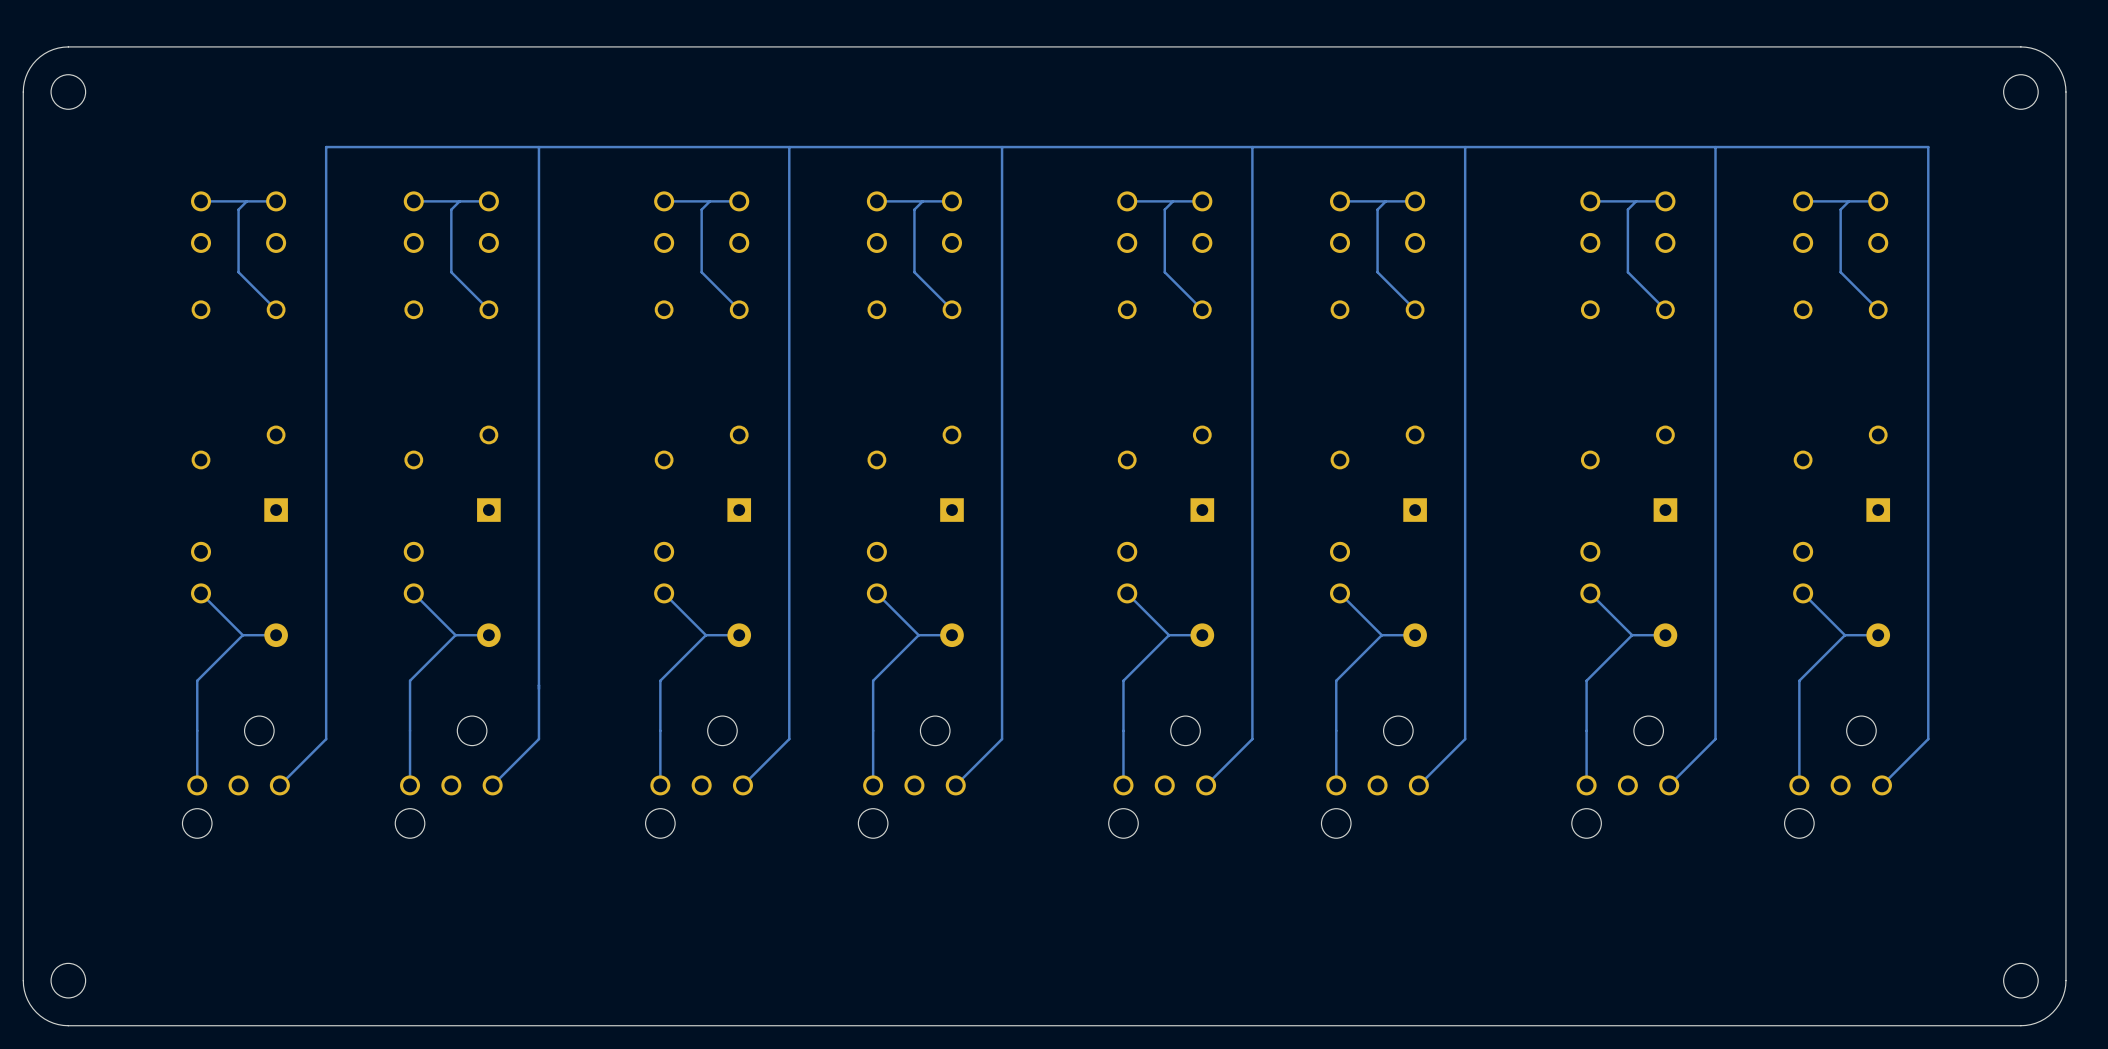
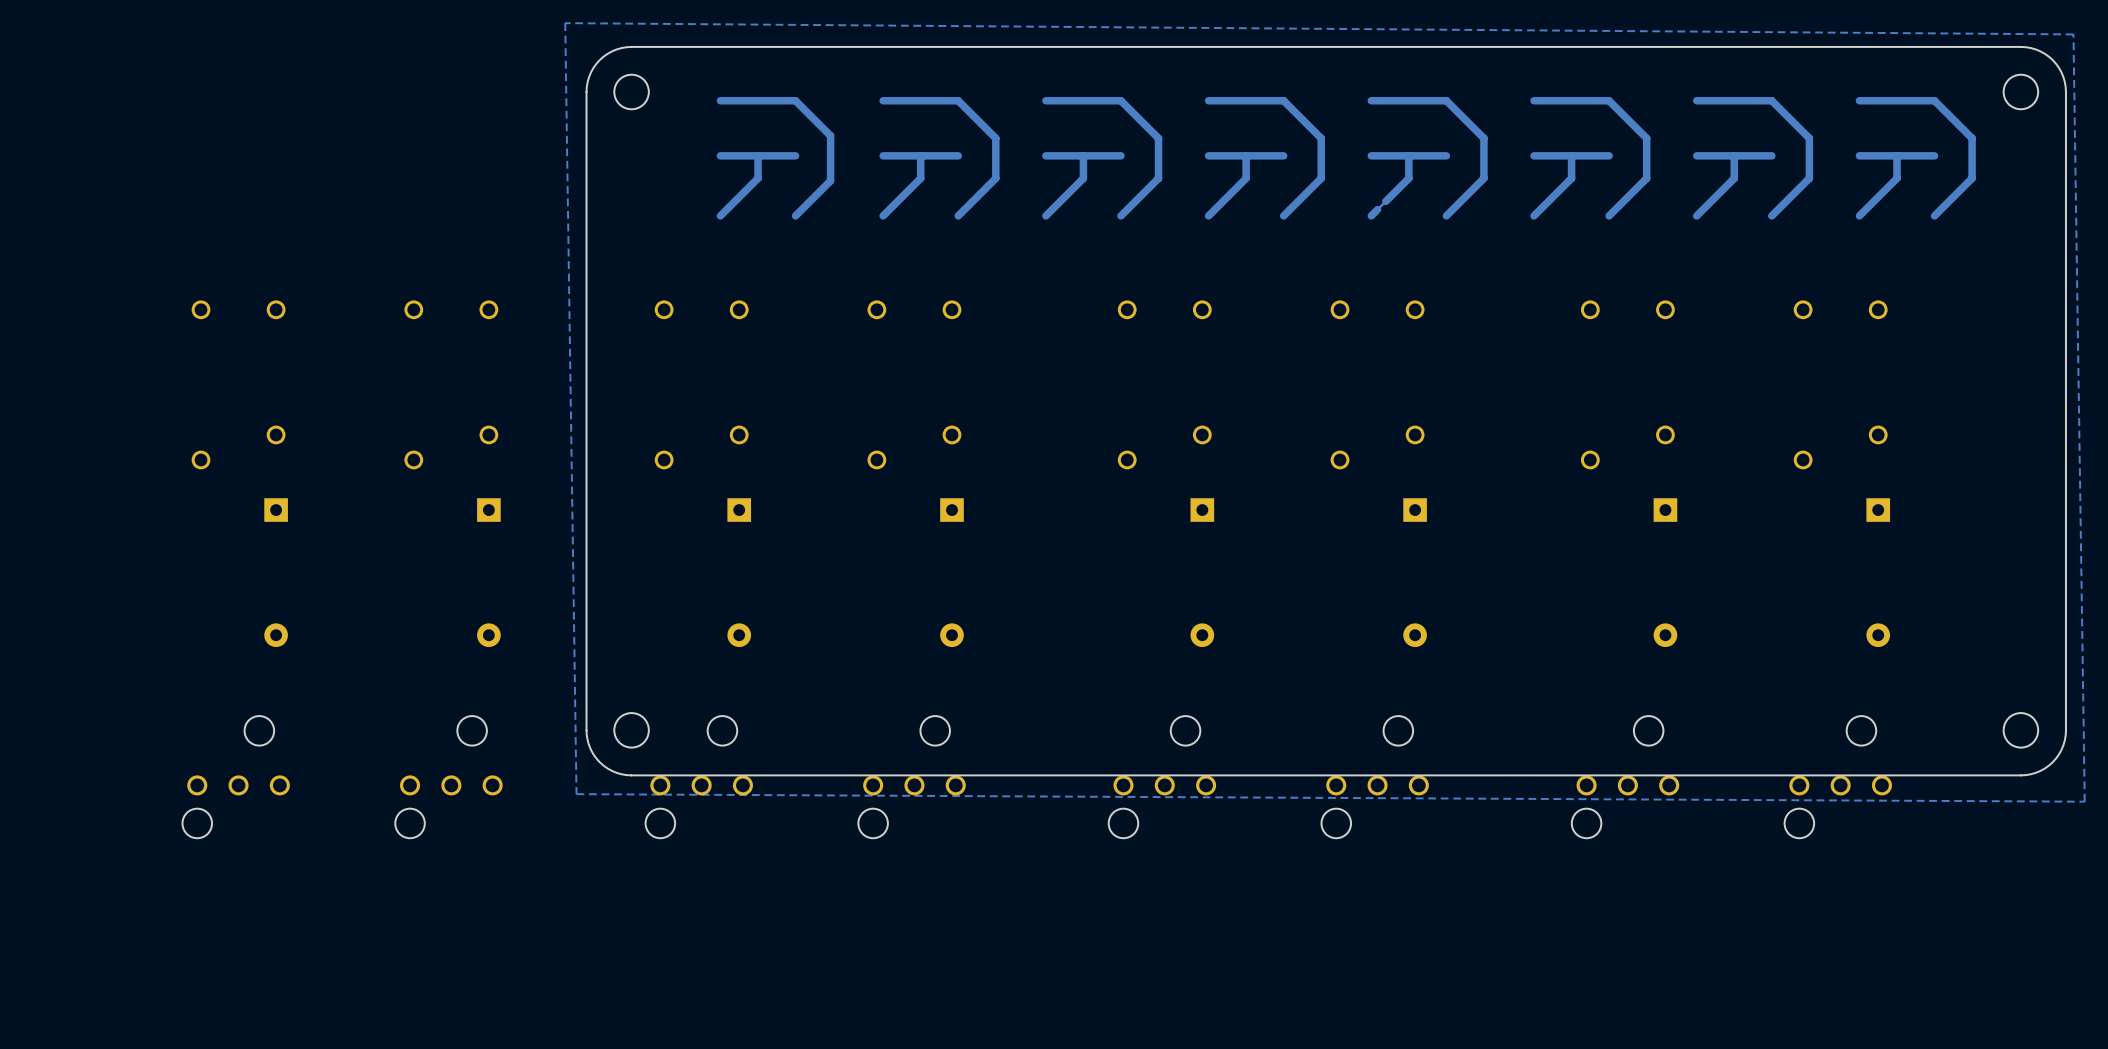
zone outline: none -> (565, 23) (2073, 34) (2084, 801) (576, 794) (565, 23)
board edge: (631, 46) (68, 46) (48, 51) (40, 56) (30, 68) (25, 77) (23, 91) (23, 980) (24, 990) (30, 1004) (44, 1018) (58, 1024) (68, 1025) (2025, 1025) (2040, 1021) (2052, 1012) (2061, 1000) (2065, 985) (2065, 730) -> (631, 46) (612, 51) (599, 60) (590, 72) (586, 91) (586, 730) (587, 740) (593, 754) (603, 765) (612, 770) (631, 775) (2020, 775) (2035, 772) (2052, 762) (2063, 745) (2065, 730)
round board edge: [50, 74, 86, 110] -> none
round board edge: none -> [614, 74, 649, 110]
track: none -> (720, 100) (795, 100) (830, 135) (830, 180) (795, 215)
track: none -> (883, 100) (958, 100) (995, 138) (995, 178) (958, 215)
track: none -> (1045, 100) (1120, 100) (1158, 138) (1158, 178) (1120, 215)
track: none -> (1208, 100) (1283, 100) (1321, 138) (1321, 178) (1283, 215)
track: none -> (1371, 100) (1446, 100) (1483, 138) (1483, 178) (1446, 215)
track: none -> (1534, 100) (1609, 100) (1646, 138) (1646, 178) (1609, 215)
track: none -> (1696, 100) (1771, 100) (1809, 138) (1809, 178) (1771, 215)
track: none -> (1859, 100) (1934, 100) (1972, 138) (1972, 178) (1934, 215)
track: (538, 147) (538, 739) (492, 785) -> none
track: (789, 147) (789, 739) (742, 785) -> none
track: (1002, 147) (1002, 739) (955, 785) -> none
track: (1252, 147) (1252, 739) (1206, 785) -> none
track: (1465, 147) (1465, 739) (1418, 785) -> none
track: (1715, 147) (1715, 739) (1669, 785) -> none
track: none -> (757, 155) (757, 178) (720, 215)
track: none -> (920, 155) (920, 178) (883, 215)
track: none -> (1083, 155) (1083, 178) (1045, 215)
track: none -> (1120, 155) (1045, 155)
track: none -> (1246, 155) (1246, 178) (1208, 215)
track: none -> (1408, 155) (1408, 178) (1385, 201)
track: none -> (1571, 155) (1571, 178) (1534, 215)
track: none -> (1734, 155) (1734, 178) (1696, 215)
track: none -> (1771, 155) (1696, 155)
track: none -> (1896, 155) (1896, 178) (1859, 215)
track: (246, 201) (238, 209) (238, 272) (276, 309) -> none
track: (276, 201) (201, 201) -> none
track: (459, 201) (451, 209) (451, 272) (488, 309) -> none
track: (488, 201) (413, 201) -> none
track: (709, 201) (701, 209) (701, 272) (739, 309) -> none
track: (739, 201) (664, 201) -> (795, 155) (720, 155)
track: (922, 201) (914, 209) (914, 272) (952, 309) -> none
track: (952, 201) (876, 201) -> (958, 155) (883, 155)
track: (1173, 201) (1164, 209) (1164, 272) (1202, 309) -> none
track: (1202, 201) (1127, 201) -> (1283, 155) (1208, 155)
track: (1415, 201) (1340, 201) -> (1446, 155) (1371, 155)
track: (1636, 201) (1627, 209) (1627, 272) (1665, 309) -> none
track: (1665, 201) (1590, 201) -> (1609, 155) (1534, 155)
track: (1848, 201) (1840, 209) (1840, 272) (1878, 309) -> none
track: (1878, 201) (1803, 201) -> (1934, 155) (1859, 155)
track: (1377, 209) (1377, 272) (1415, 309) -> (1377, 209) (1371, 215)
part: (201, 222) -> none
part: (276, 222) -> none
part: (413, 222) -> none
part: (488, 222) -> none
part: (664, 222) -> none
part: (739, 222) -> none
part: (876, 222) -> none
part: (952, 222) -> none
part: (1127, 222) -> none
part: (1202, 222) -> none
part: (1340, 222) -> none
part: (1415, 222) -> none
part: (1590, 222) -> none
part: (1665, 222) -> none
part: (1803, 222) -> none
part: (1878, 222) -> none
part: (201, 572) -> none
part: (413, 572) -> none
part: (664, 572) -> none
part: (876, 572) -> none
part: (1127, 572) -> none
part: (1340, 572) -> none
part: (1590, 572) -> none
part: (1803, 572) -> none
track: (201, 593) (242, 635) -> none
track: (413, 593) (455, 635) -> none
track: (664, 593) (705, 635) -> none
track: (876, 593) (918, 635) -> none
track: (1127, 593) (1169, 635) -> none
track: (1340, 593) (1381, 635) -> none
track: (1590, 593) (1632, 635) -> none
track: (1803, 593) (1844, 635) -> none
track: (242, 635) (197, 680) (197, 785) -> none
track: (276, 635) (242, 635) -> none
track: (455, 635) (410, 680) (410, 785) -> none
track: (488, 635) (455, 635) -> none
track: (705, 635) (660, 680) (660, 785) -> none
track: (739, 635) (705, 635) -> none
track: (918, 635) (873, 680) (873, 785) -> none
track: (952, 635) (918, 635) -> none
track: (1169, 635) (1123, 680) (1123, 785) -> none
track: (1202, 635) (1169, 635) -> none
track: (1381, 635) (1336, 680) (1336, 785) -> none
track: (1415, 635) (1381, 635) -> none
track: (1632, 635) (1586, 680) (1586, 785) -> none
track: (1665, 635) (1632, 635) -> none
track: (1844, 635) (1799, 680) (1799, 785) -> none
track: (1878, 635) (1844, 635) -> none
round board edge: none -> [614, 712, 649, 748]
round board edge: none -> [2003, 712, 2039, 748]
track: (1881, 785) (1928, 739) (1928, 147) (326, 147) (326, 739) (279, 785) -> none
round board edge: [50, 963, 86, 999] -> none
round board edge: [2003, 963, 2039, 999] -> none

